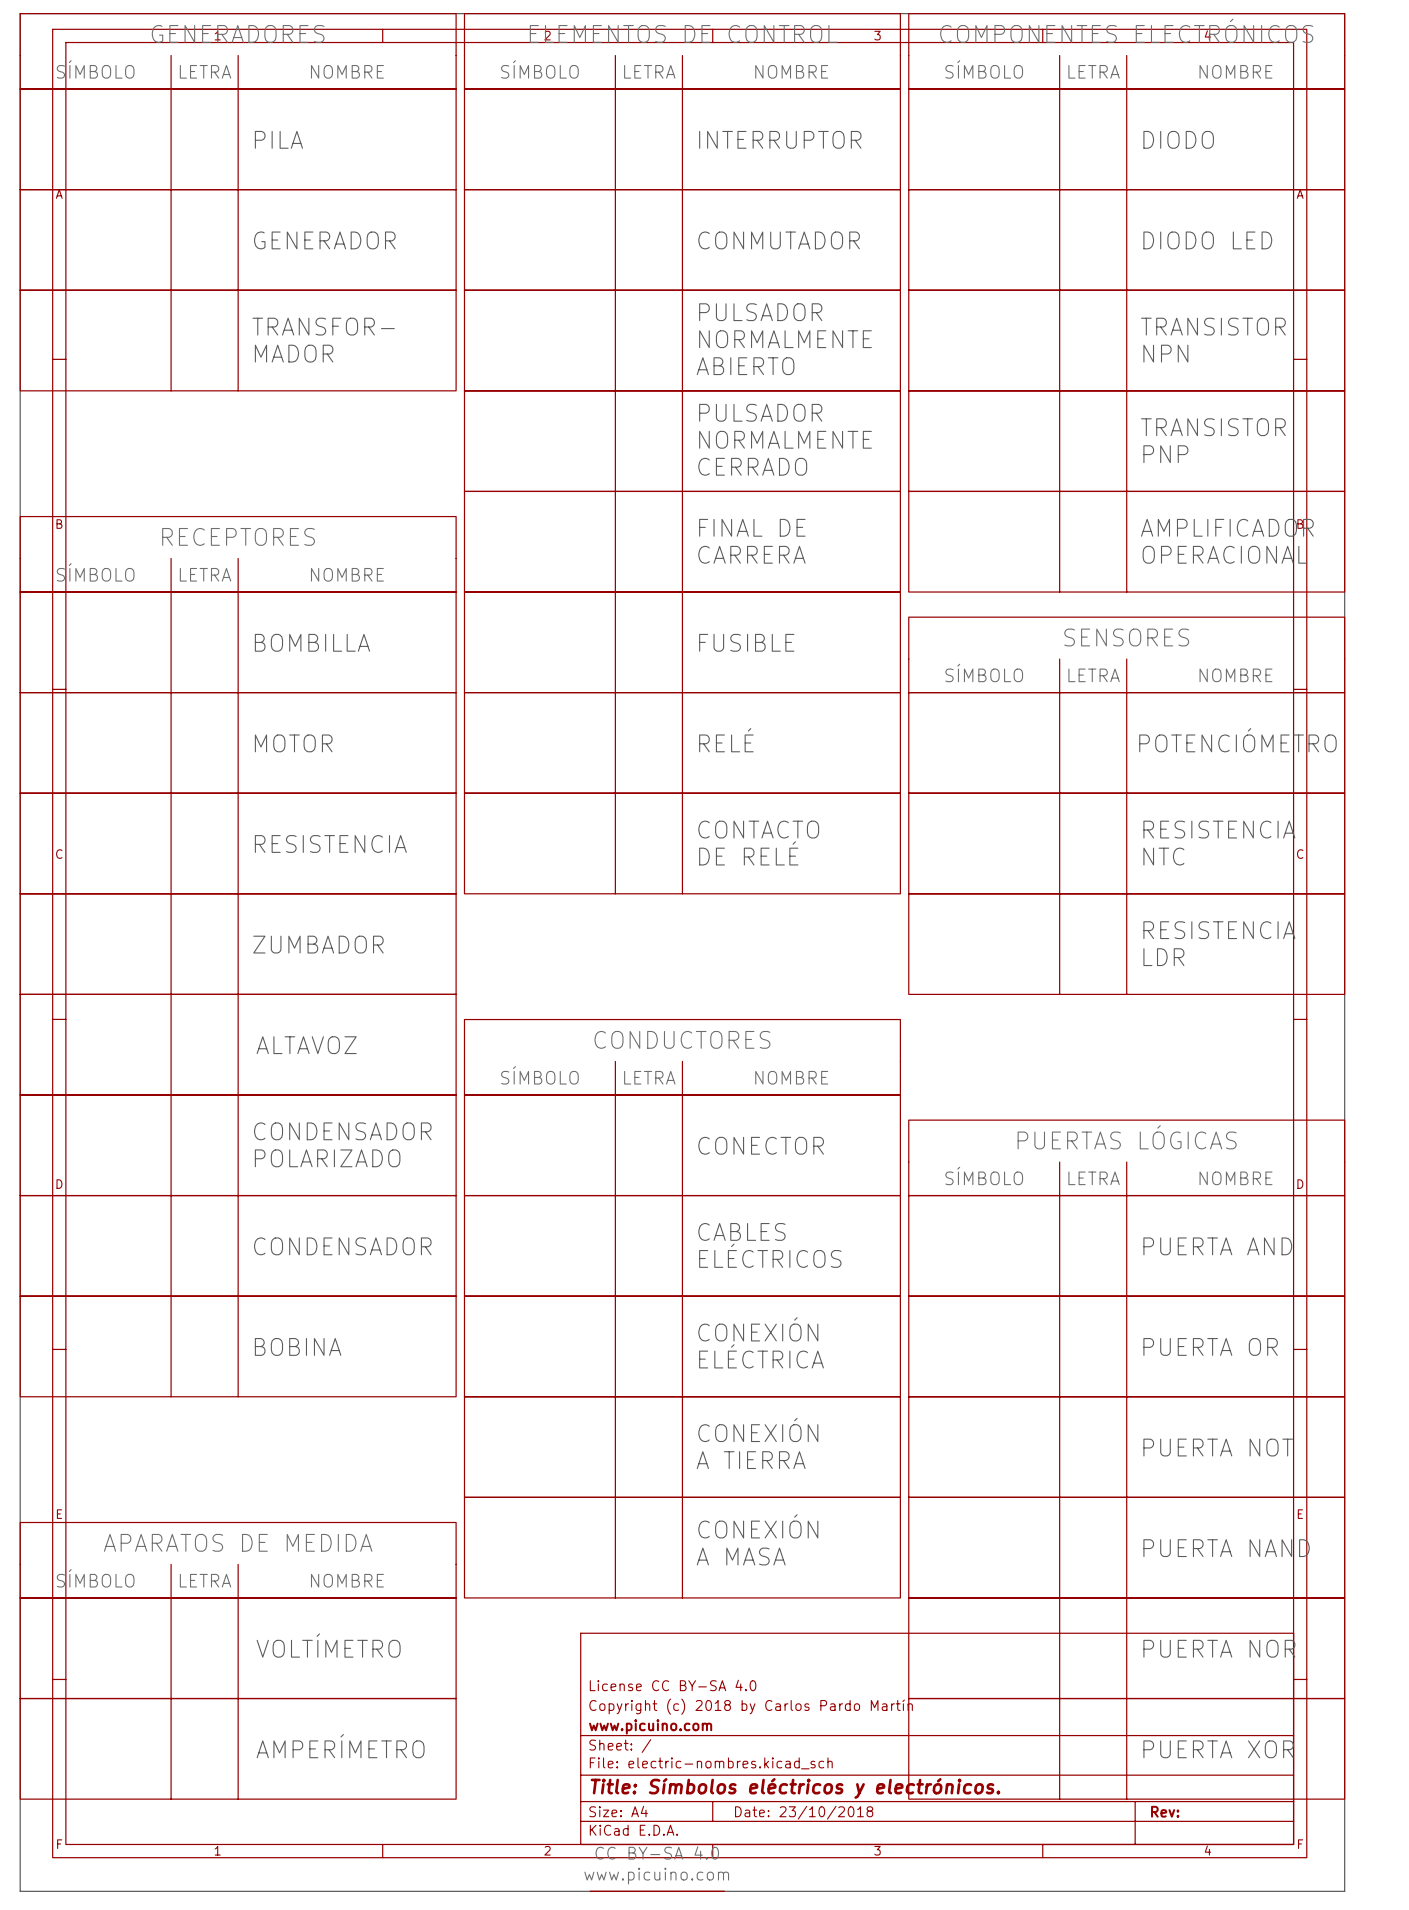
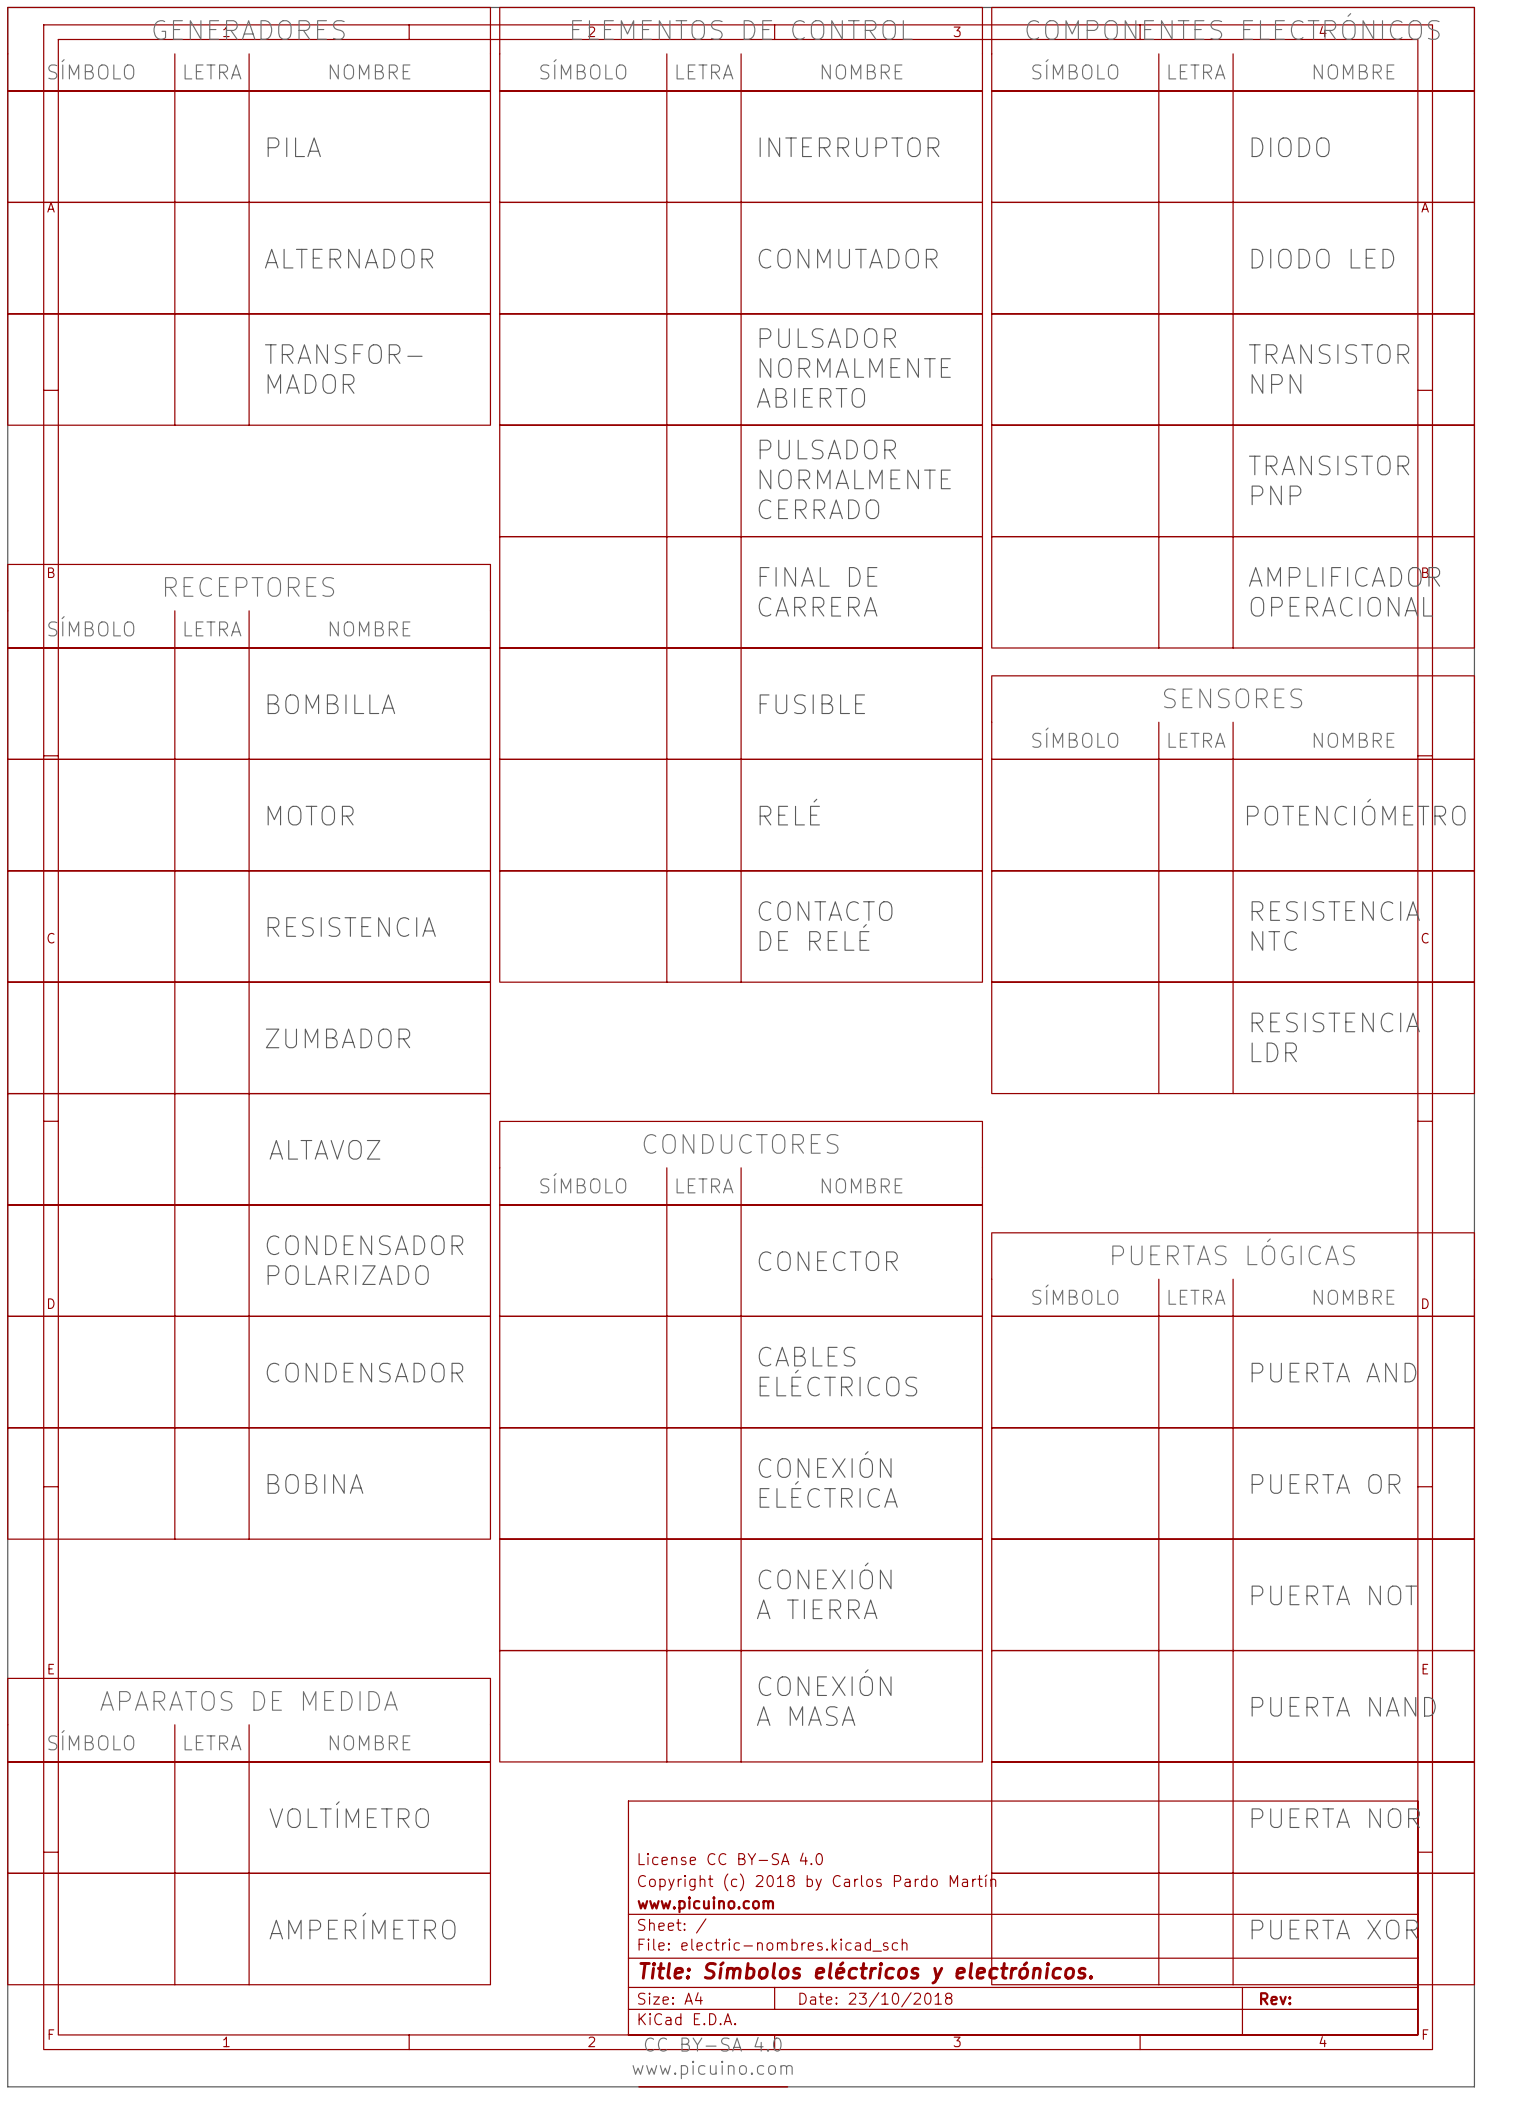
text: GENERADOR (324, 240) -> ALTERNADOR (349, 258)

